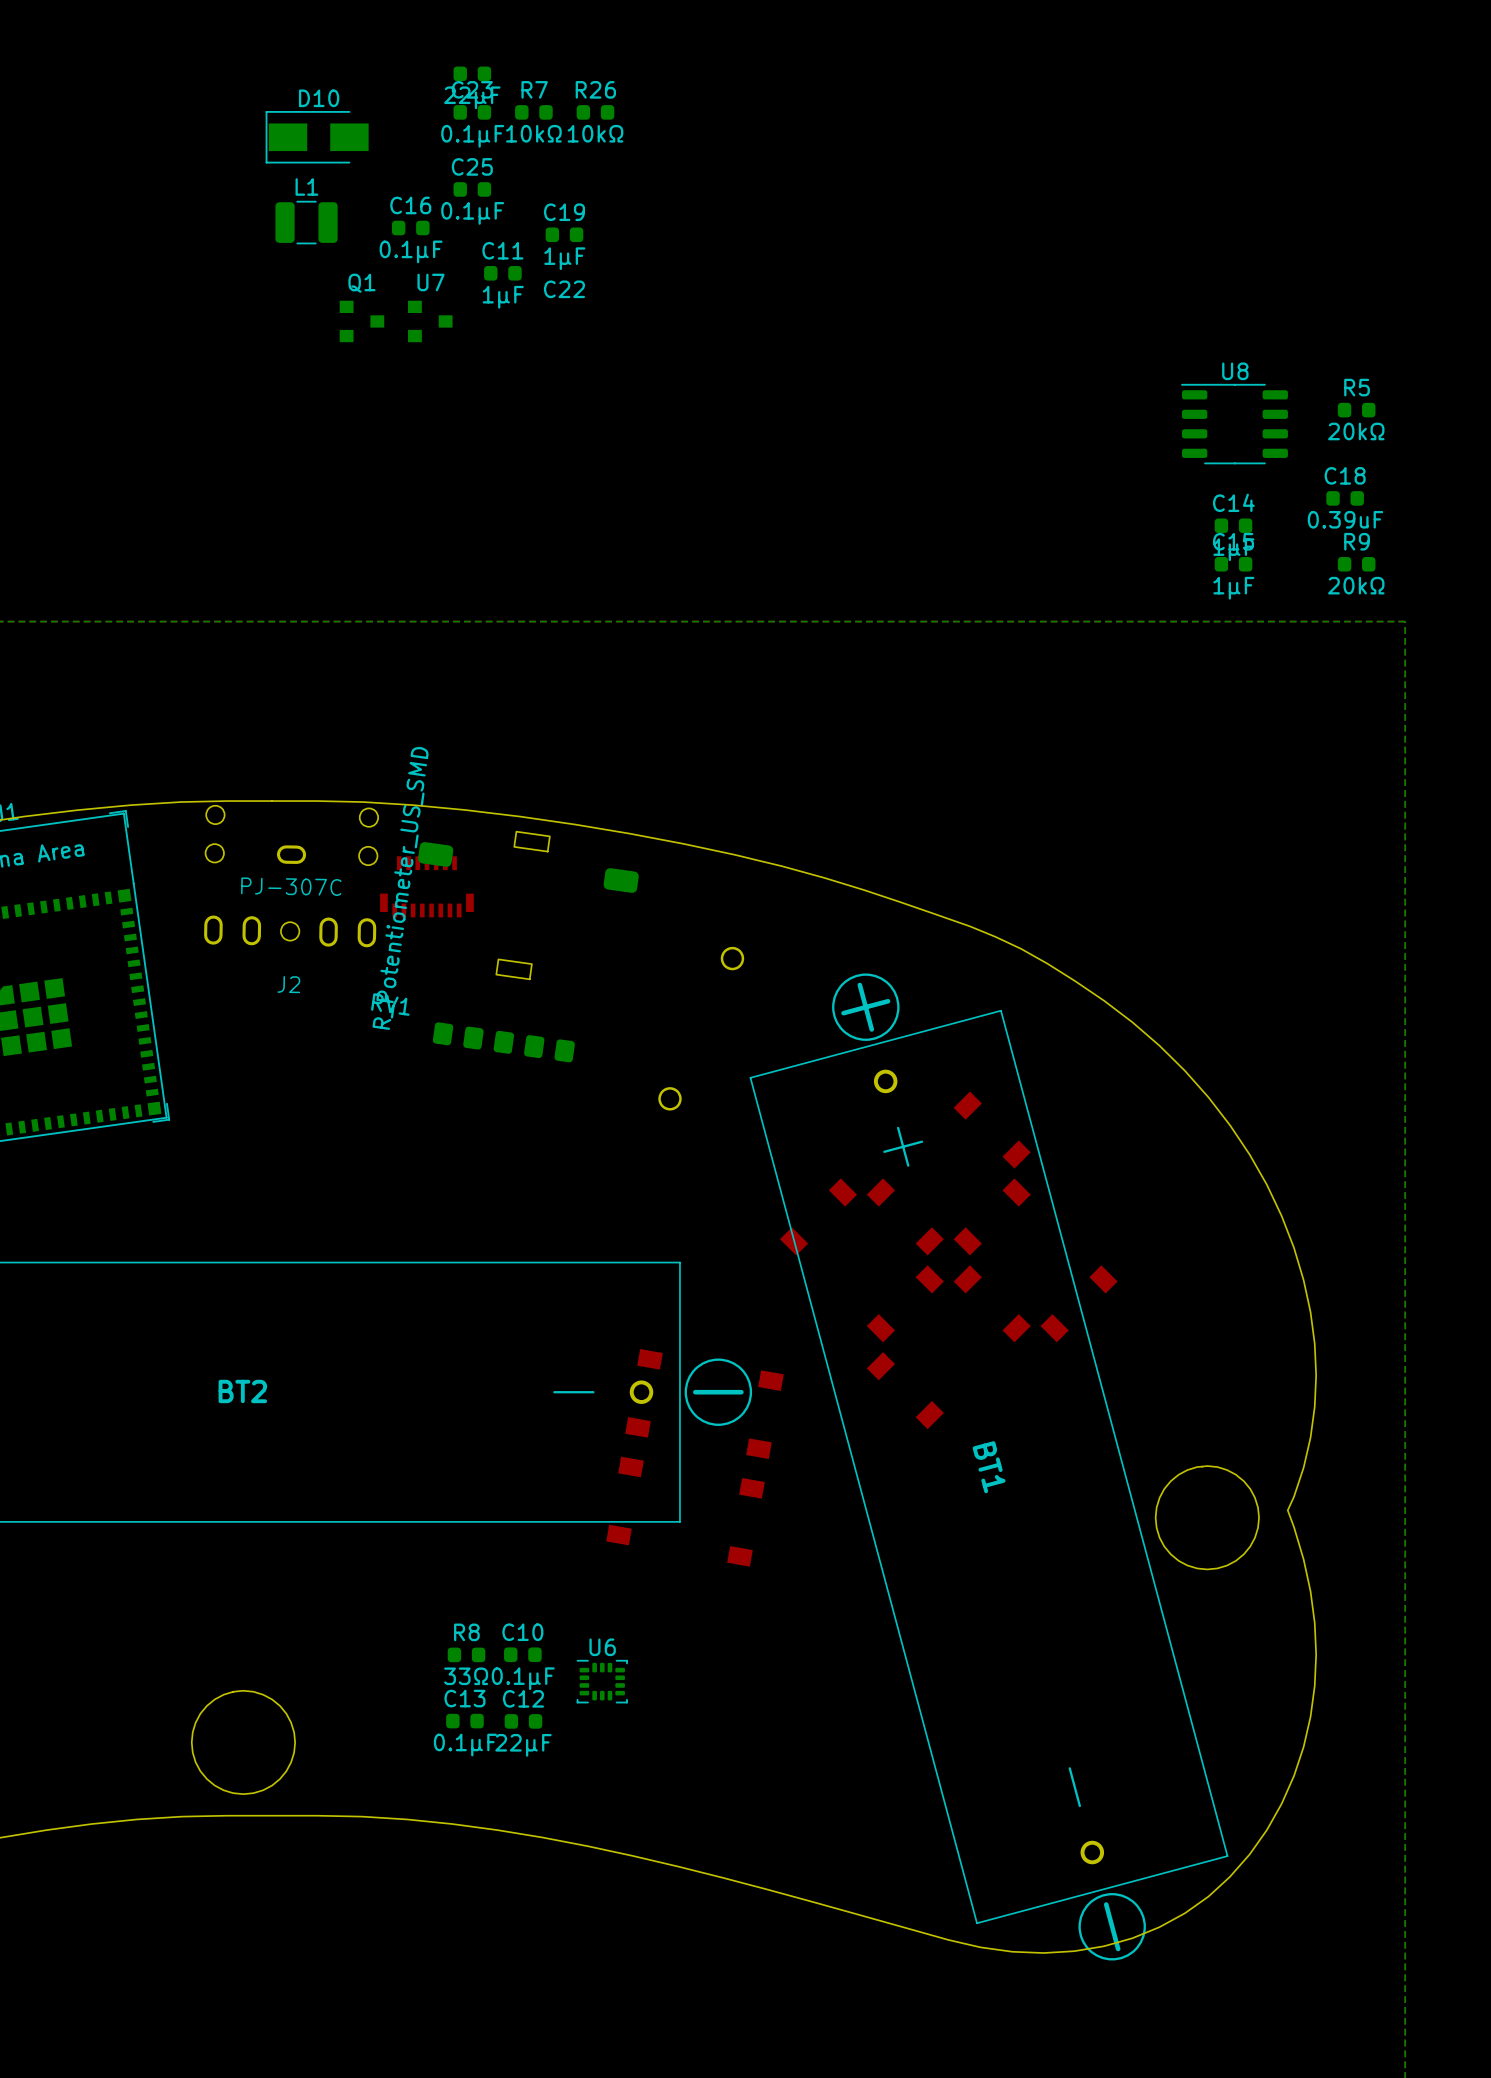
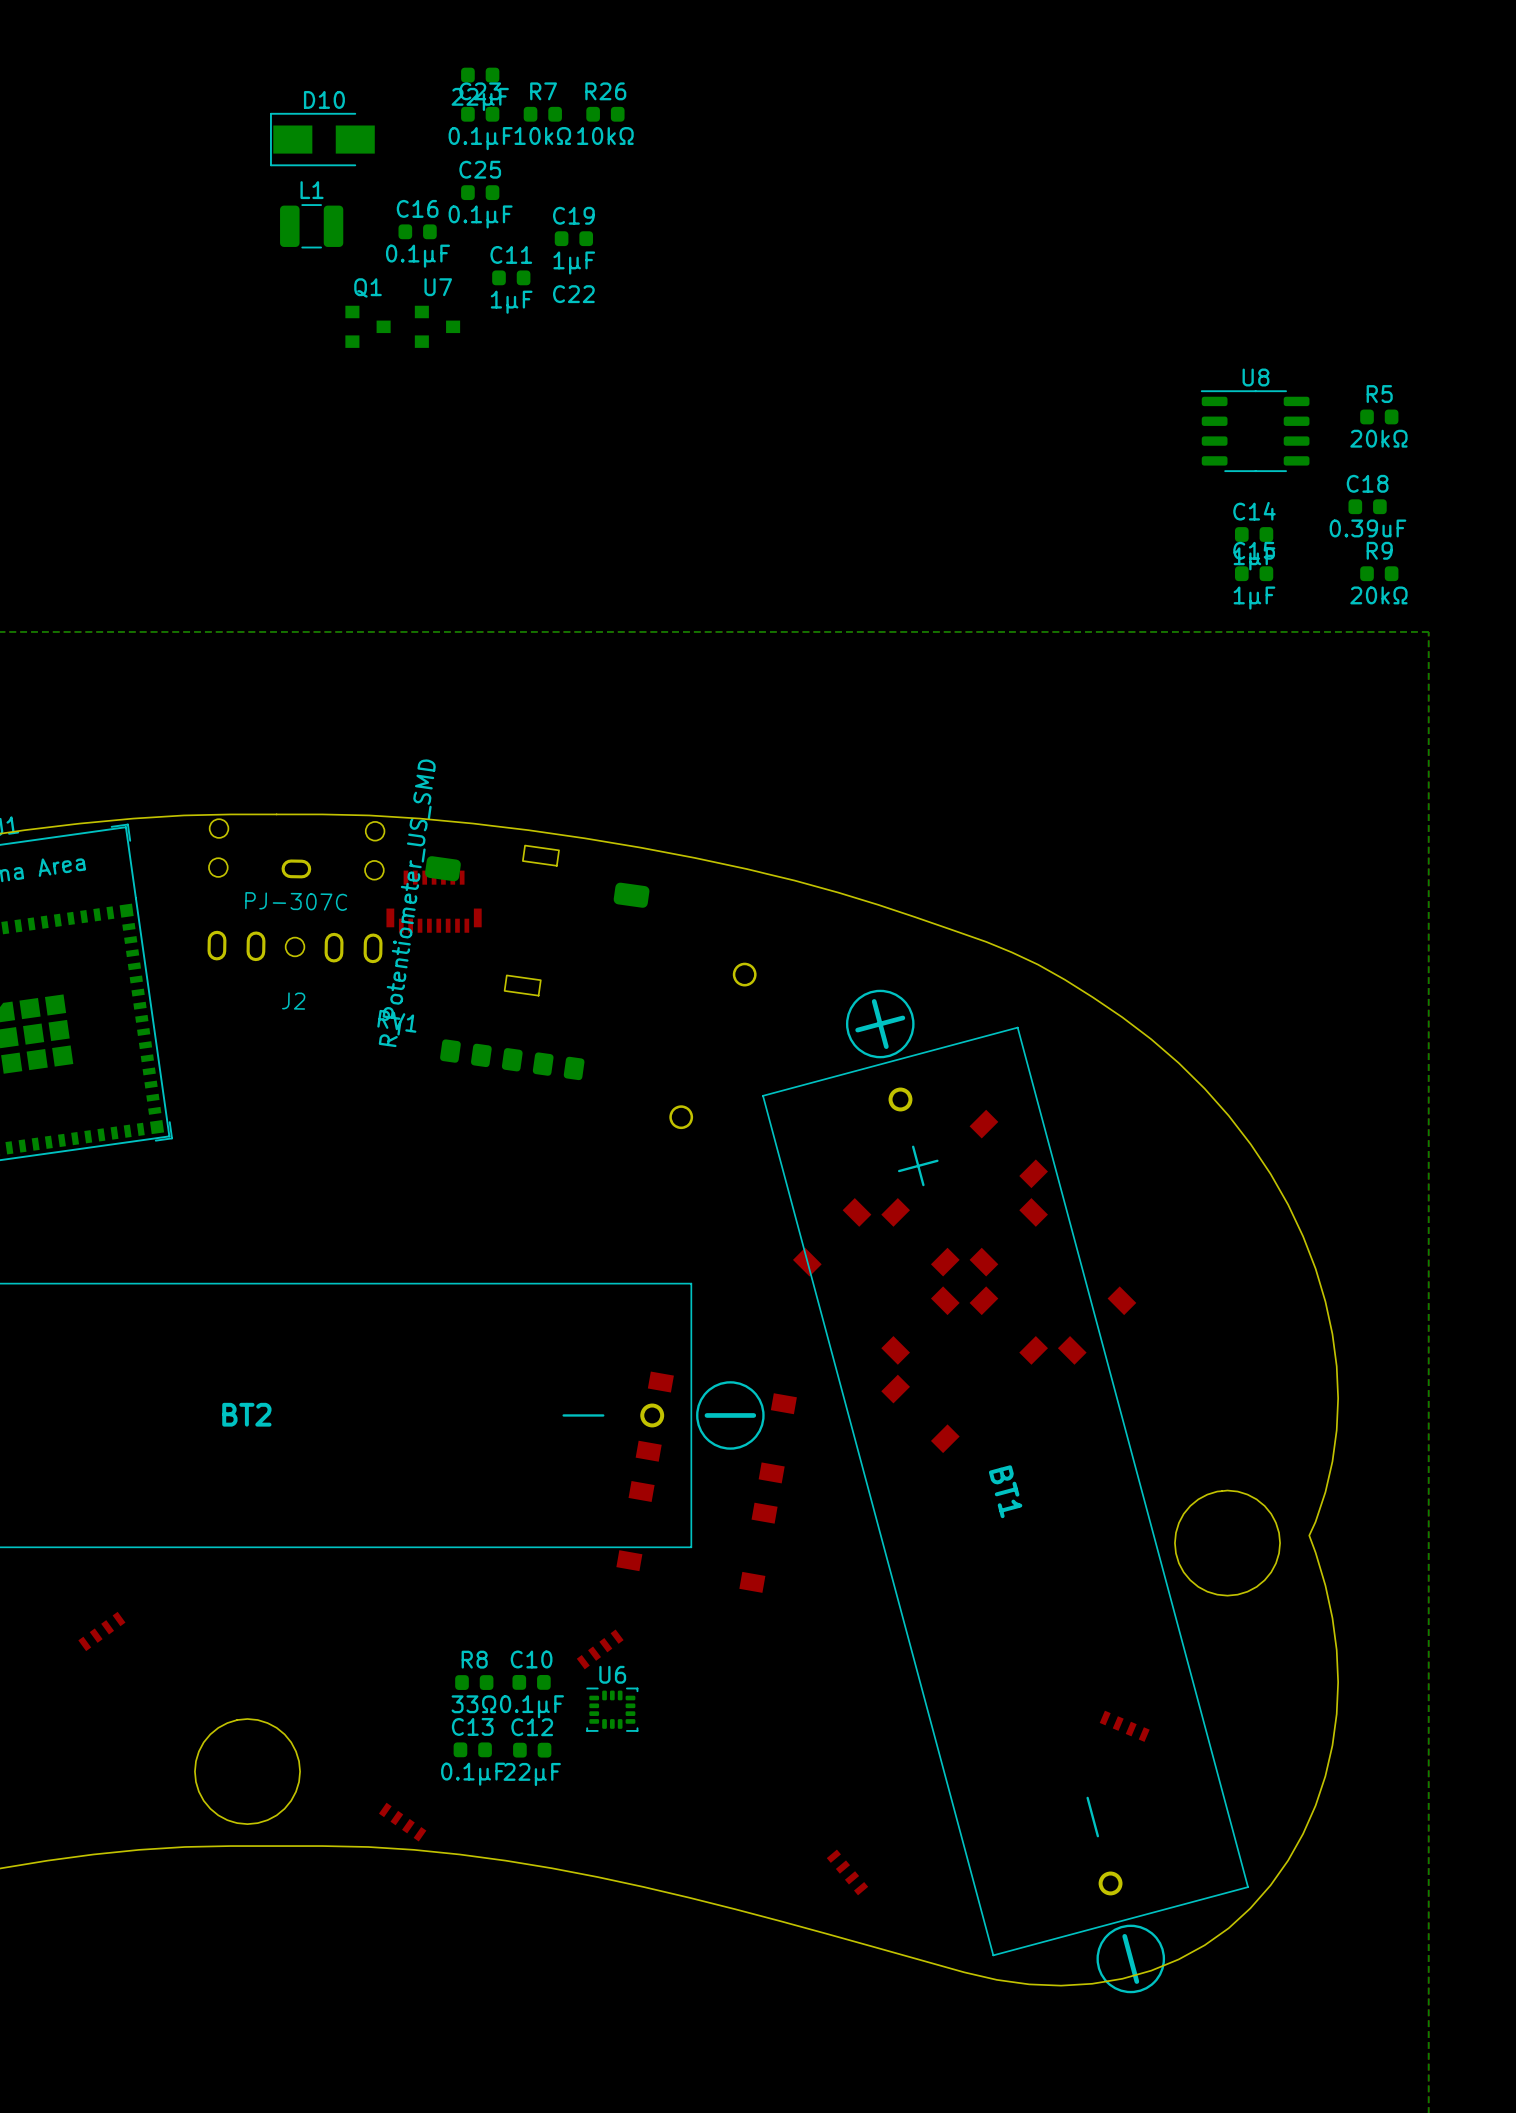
part: none -> (101, 1631)
part: none -> (600, 1649)
part: none -> (1124, 1726)
part: none -> (402, 1822)
part: none -> (847, 1872)

